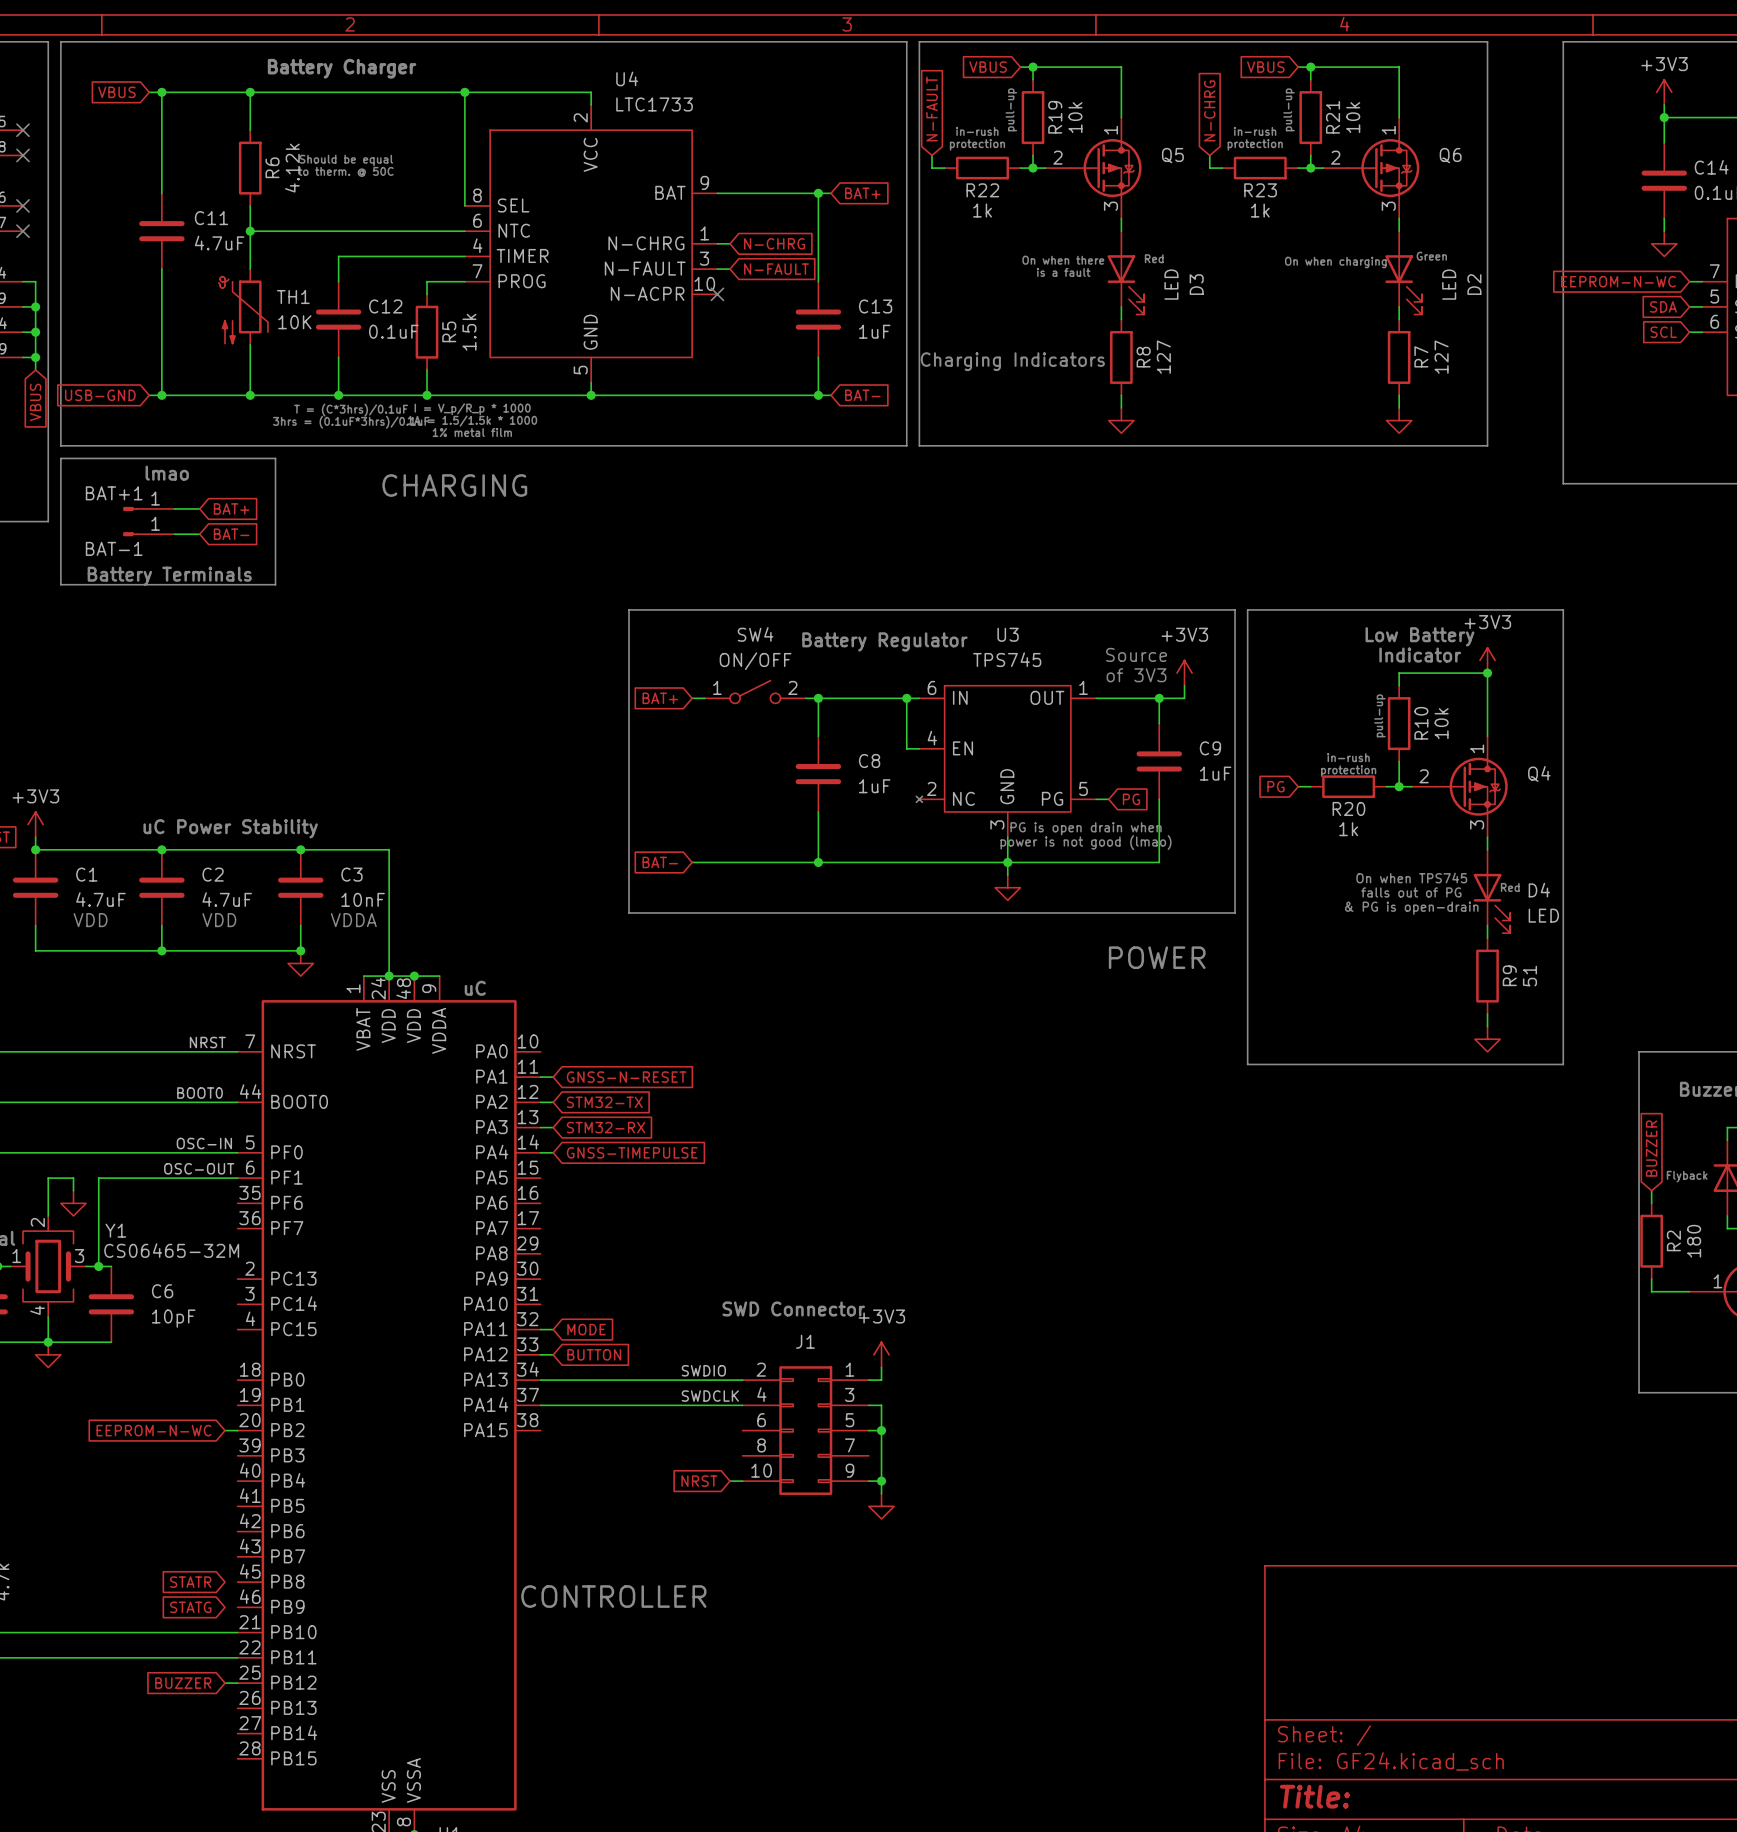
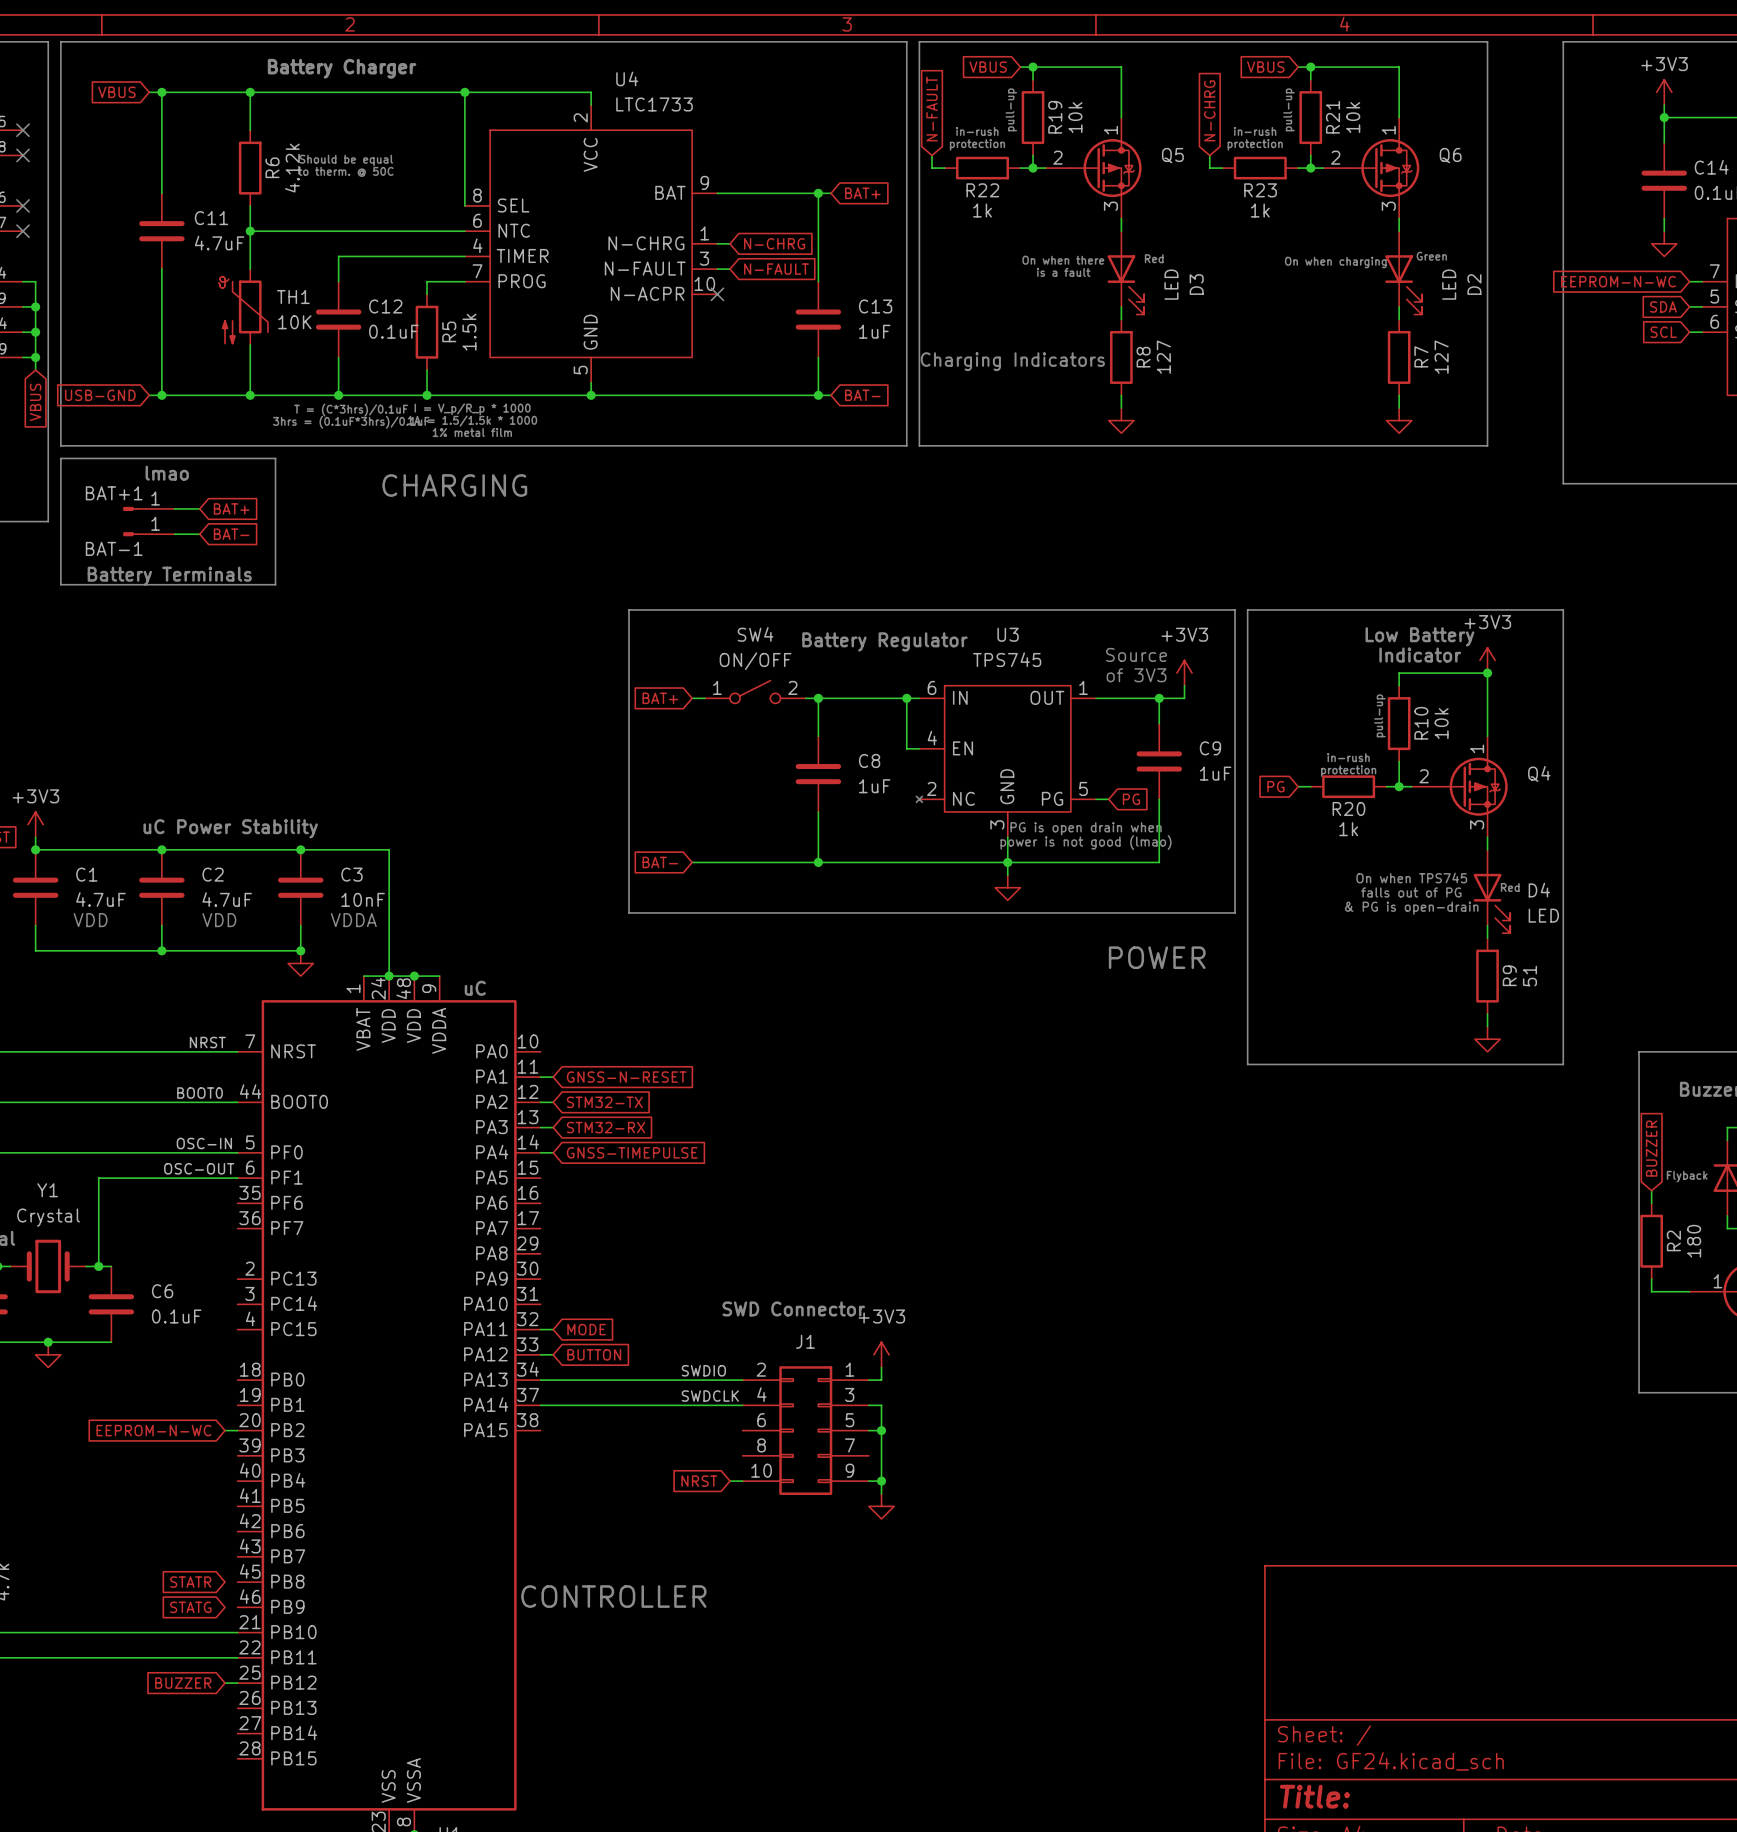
wire: (73, 1190) (73, 1178) (48, 1178) (48, 1215) -> none
power symbol: (73, 1203) -> none
Y1 symbol: [10, 1215, 87, 1317] -> [10, 1239, 87, 1294]
Y1 name position: Y1 (115, 1230) -> Y1 (47, 1190)
Y1 value: CS06465-32M (171, 1250) -> Crystal (48, 1217)
wire: (48, 1316) (48, 1342) -> none
C6 value: 10pF (173, 1318) -> 0.1uF (176, 1316)

